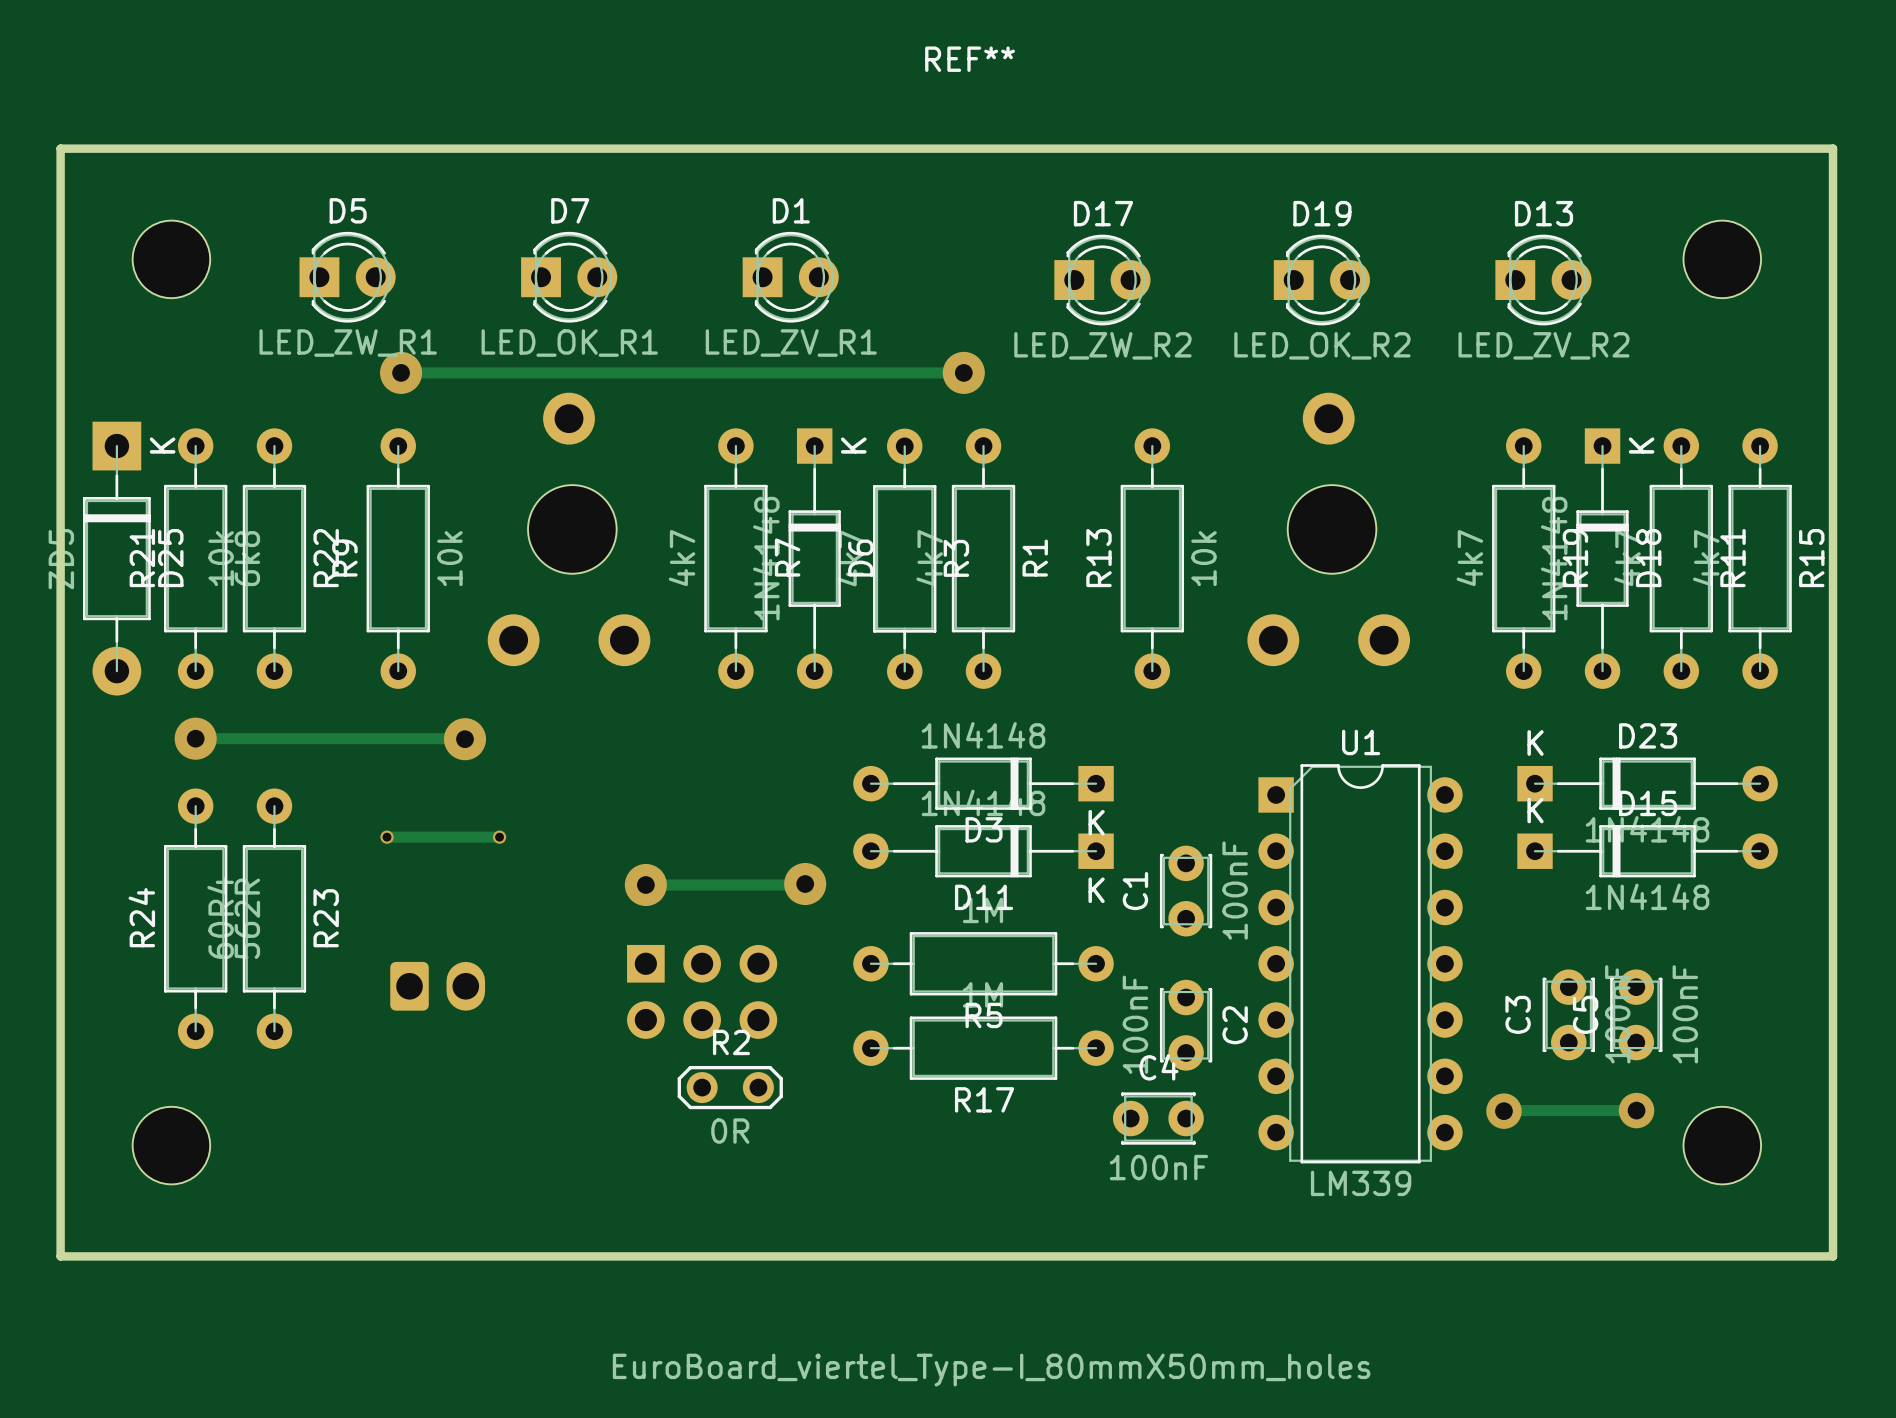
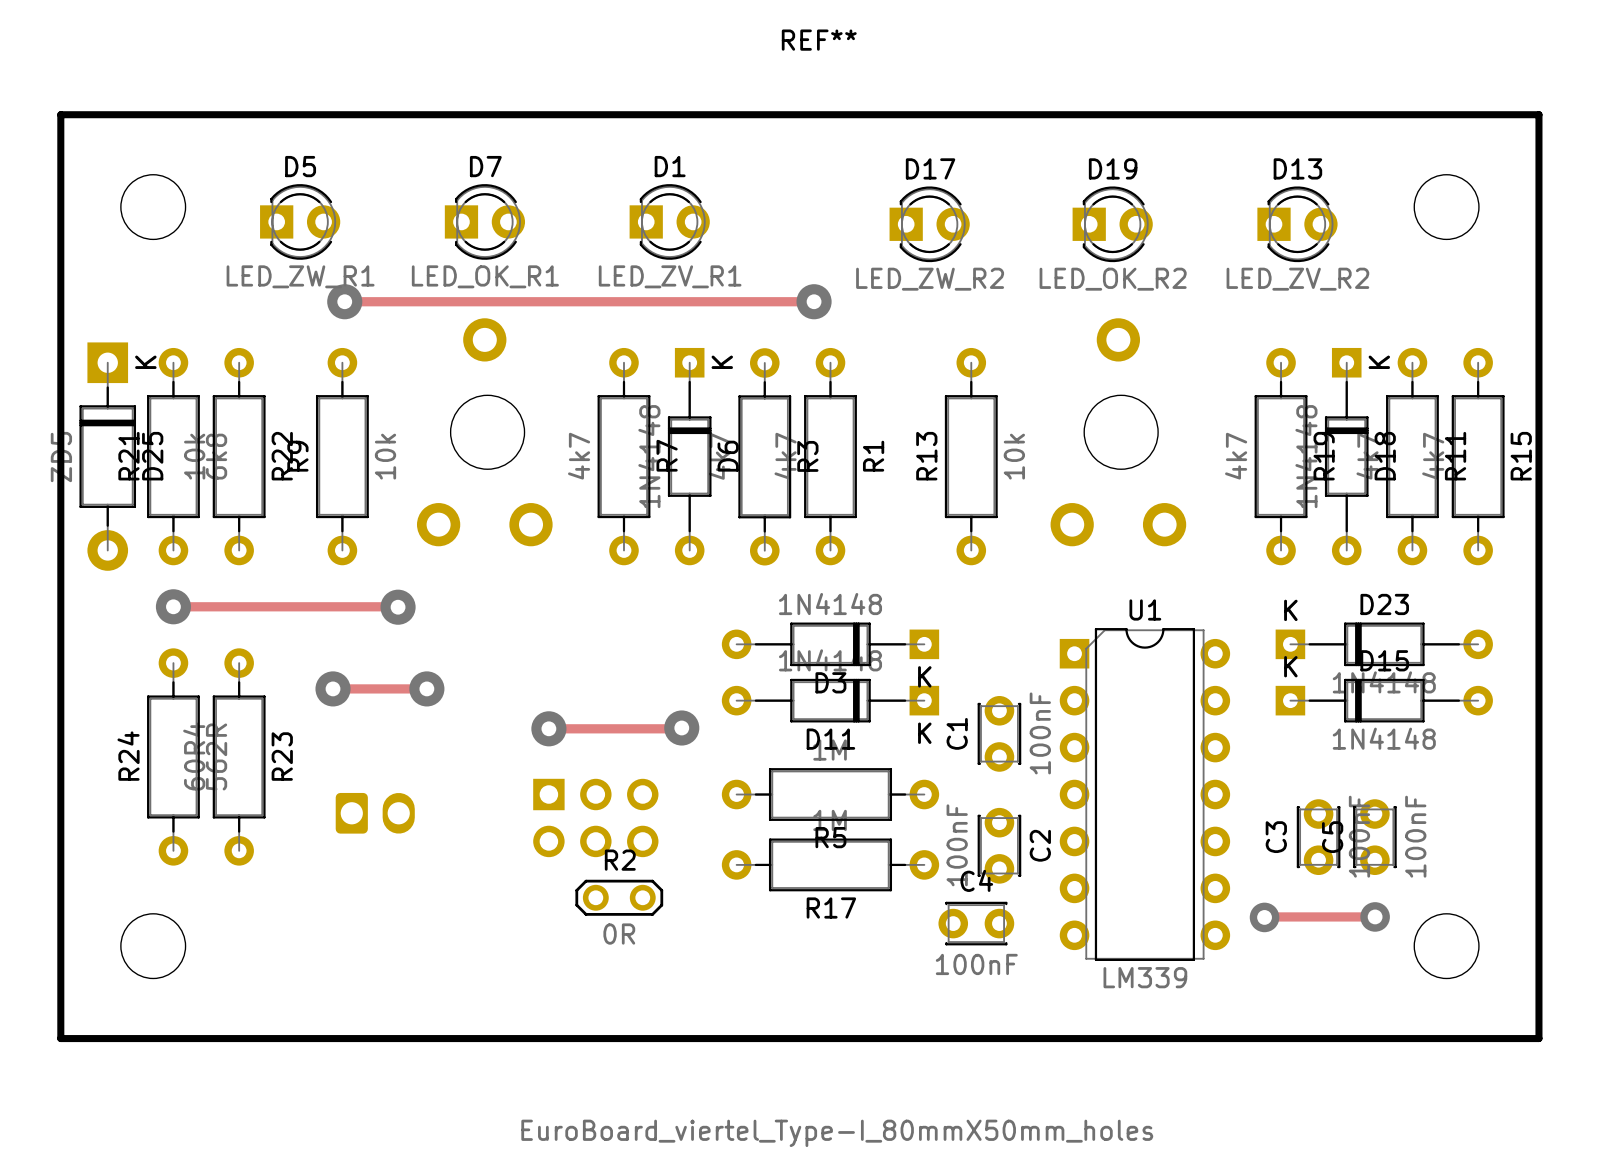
via size: [380, 830, 394, 844] -> [315, 671, 351, 707]
via size: [492, 830, 507, 844] -> [409, 671, 445, 707]

